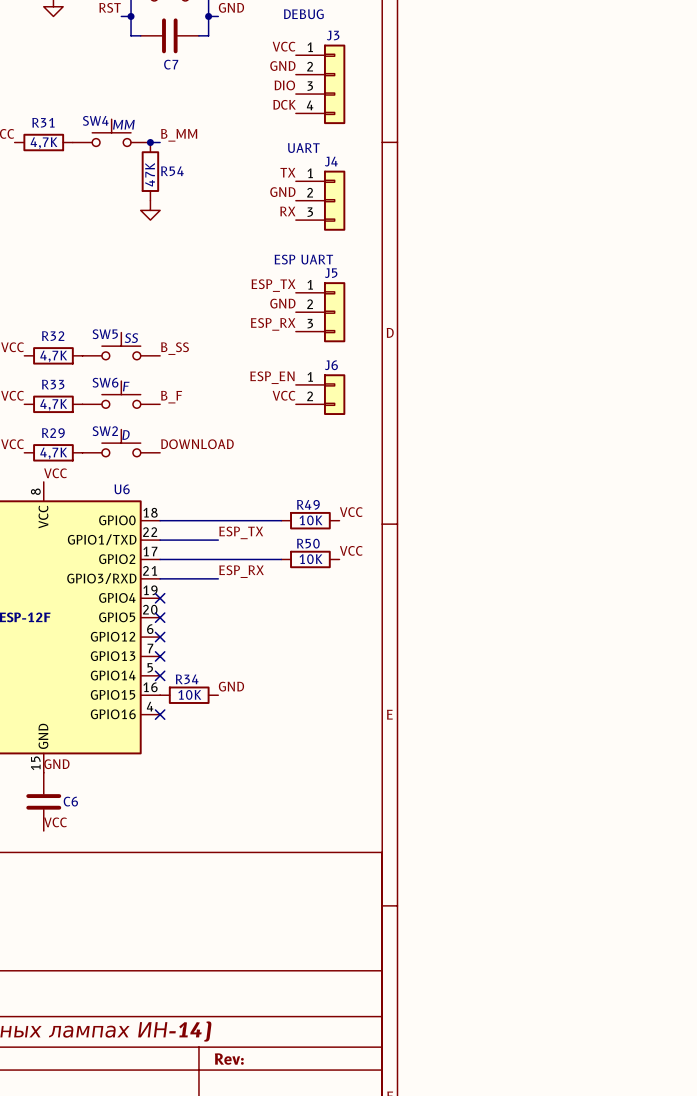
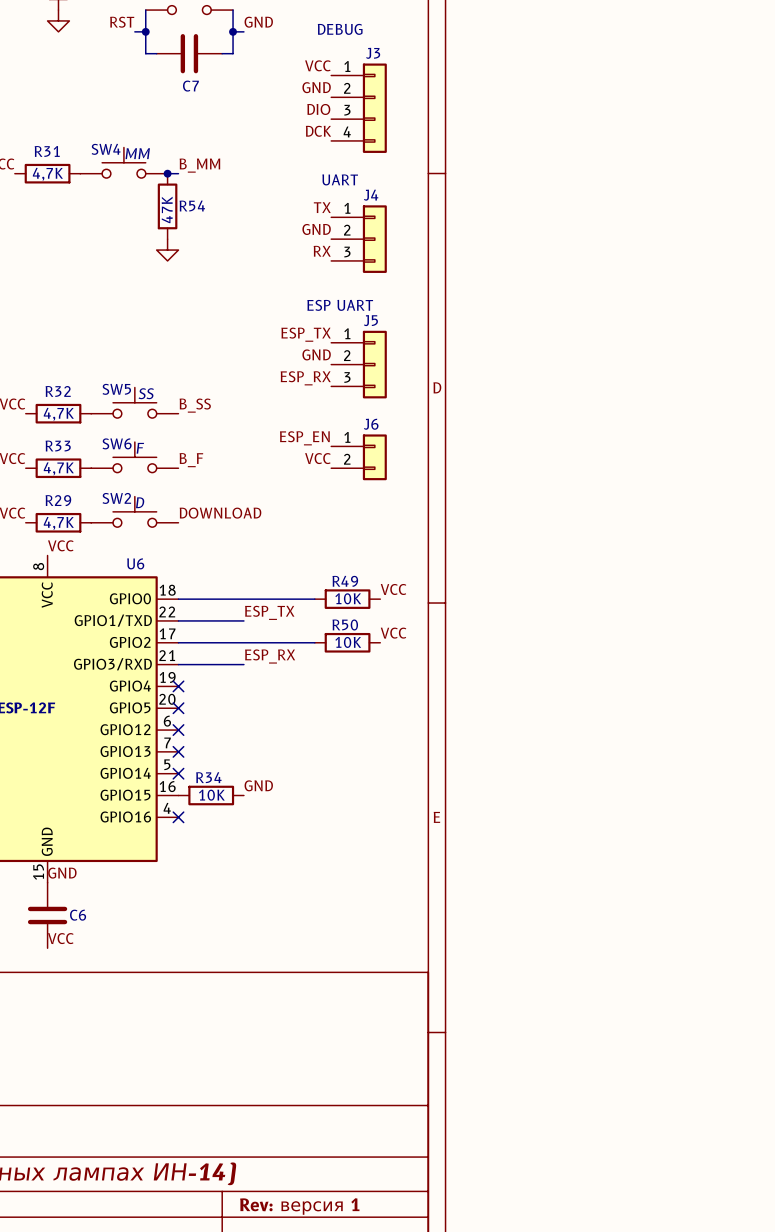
title block: Rev: (229, 1059) -> Rev: версия 1 (299, 1206)

